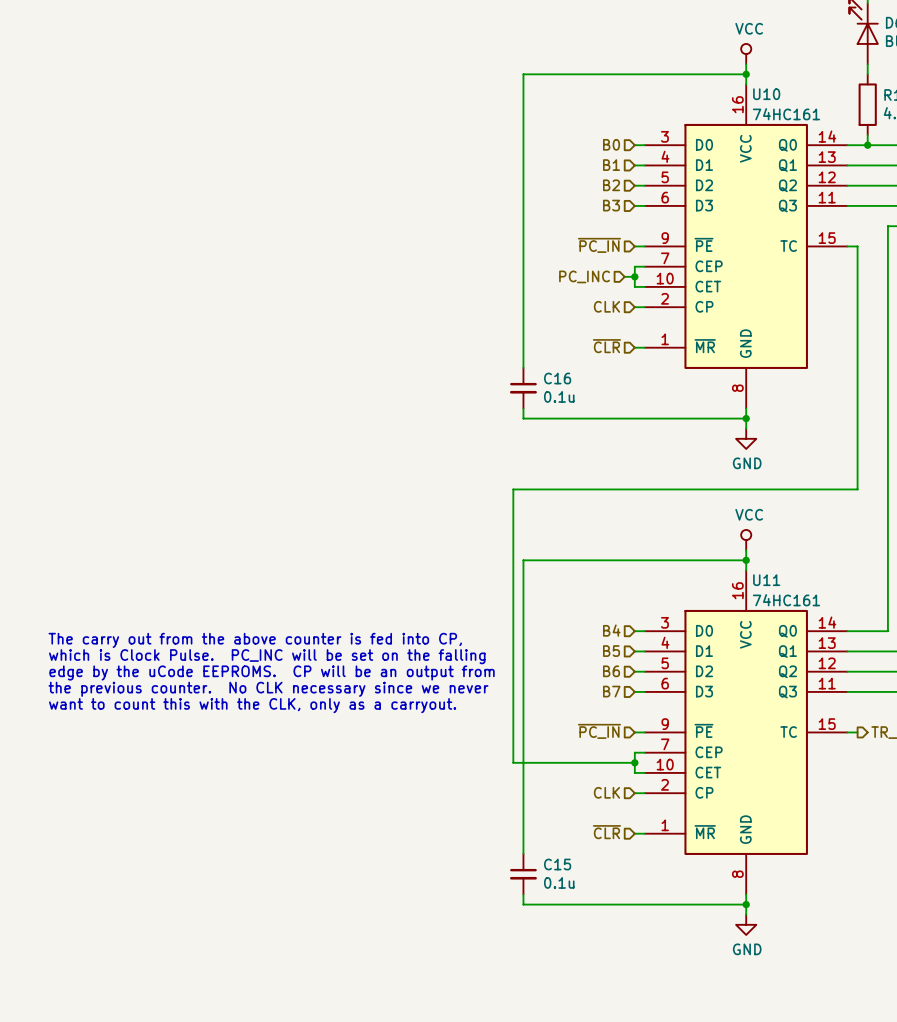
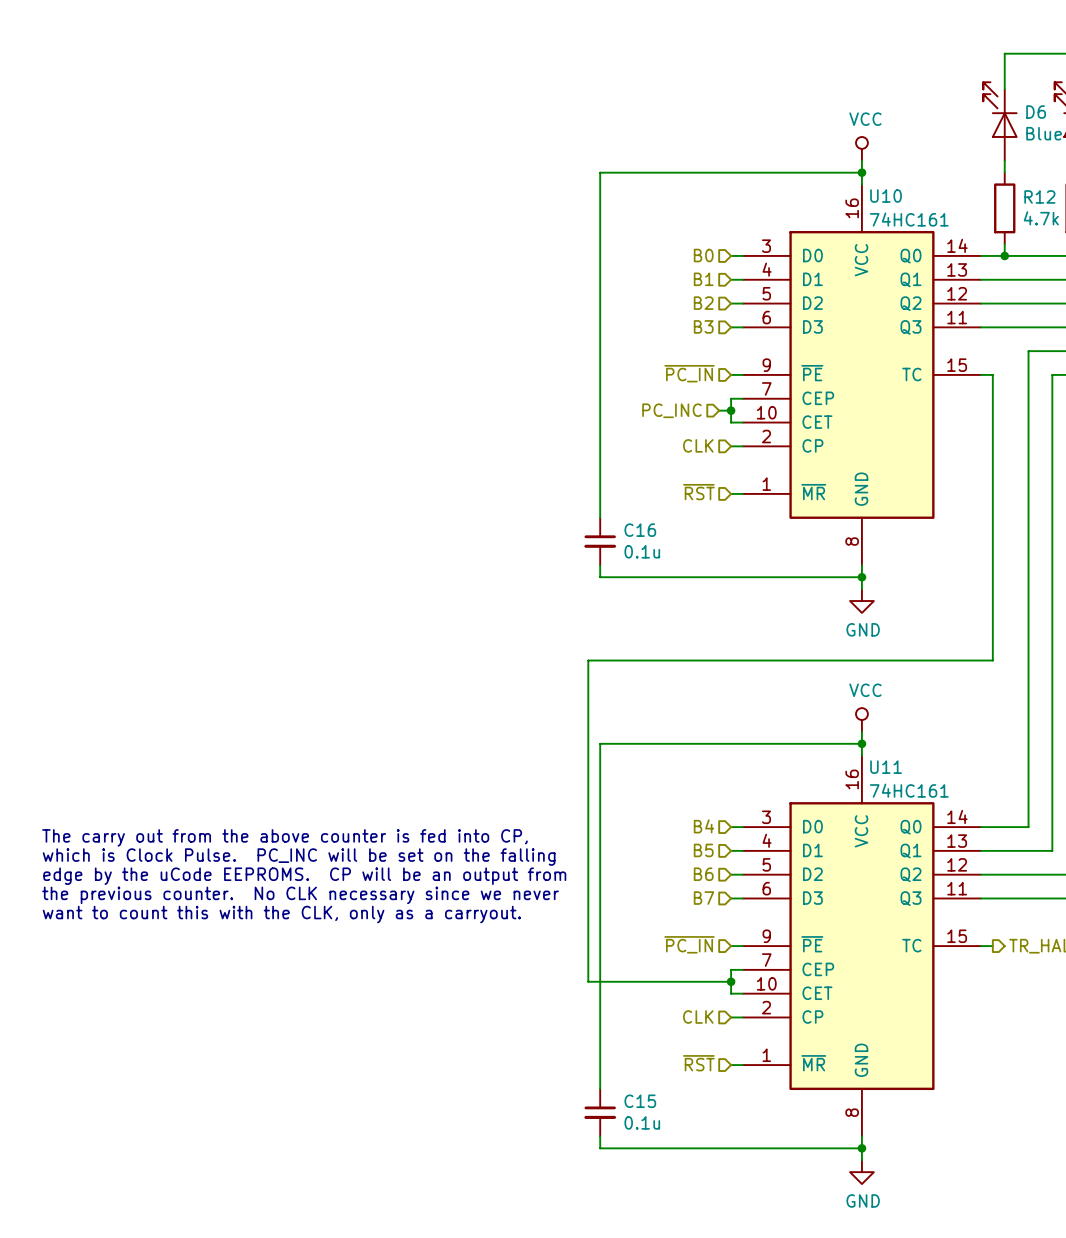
hierarchical label: ~{CLR} (606, 346) -> ~{RST} (698, 492)
hierarchical label: ~{CLR} (606, 832) -> ~{RST} (698, 1063)

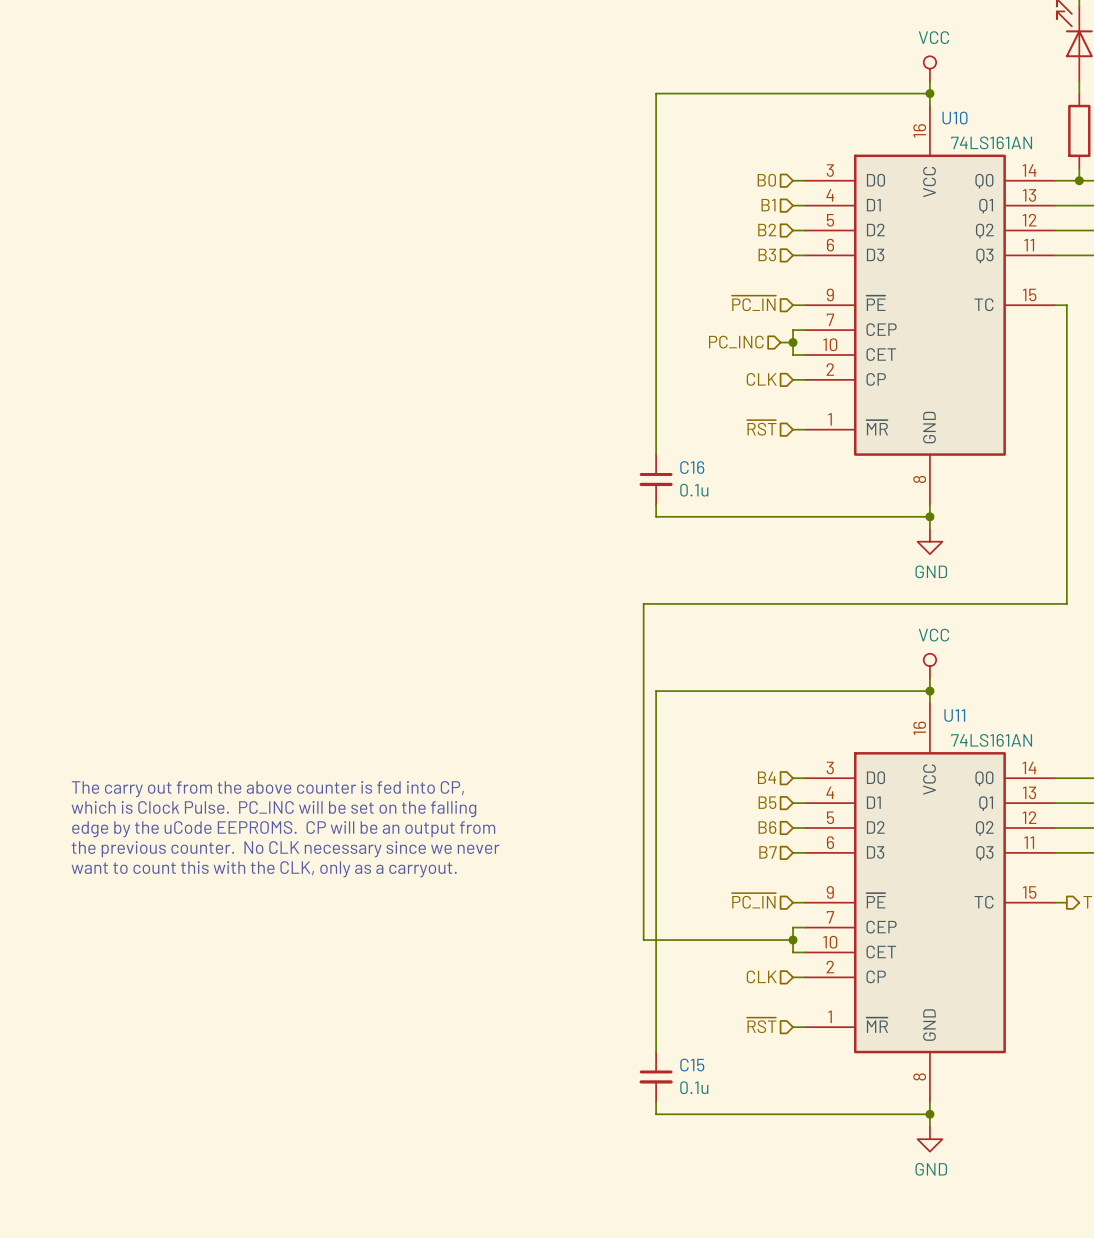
U10 value: 74HC161 (909, 219) -> 74LS161AN (991, 142)
U11 value: 74HC161 (909, 790) -> 74LS161AN (991, 740)

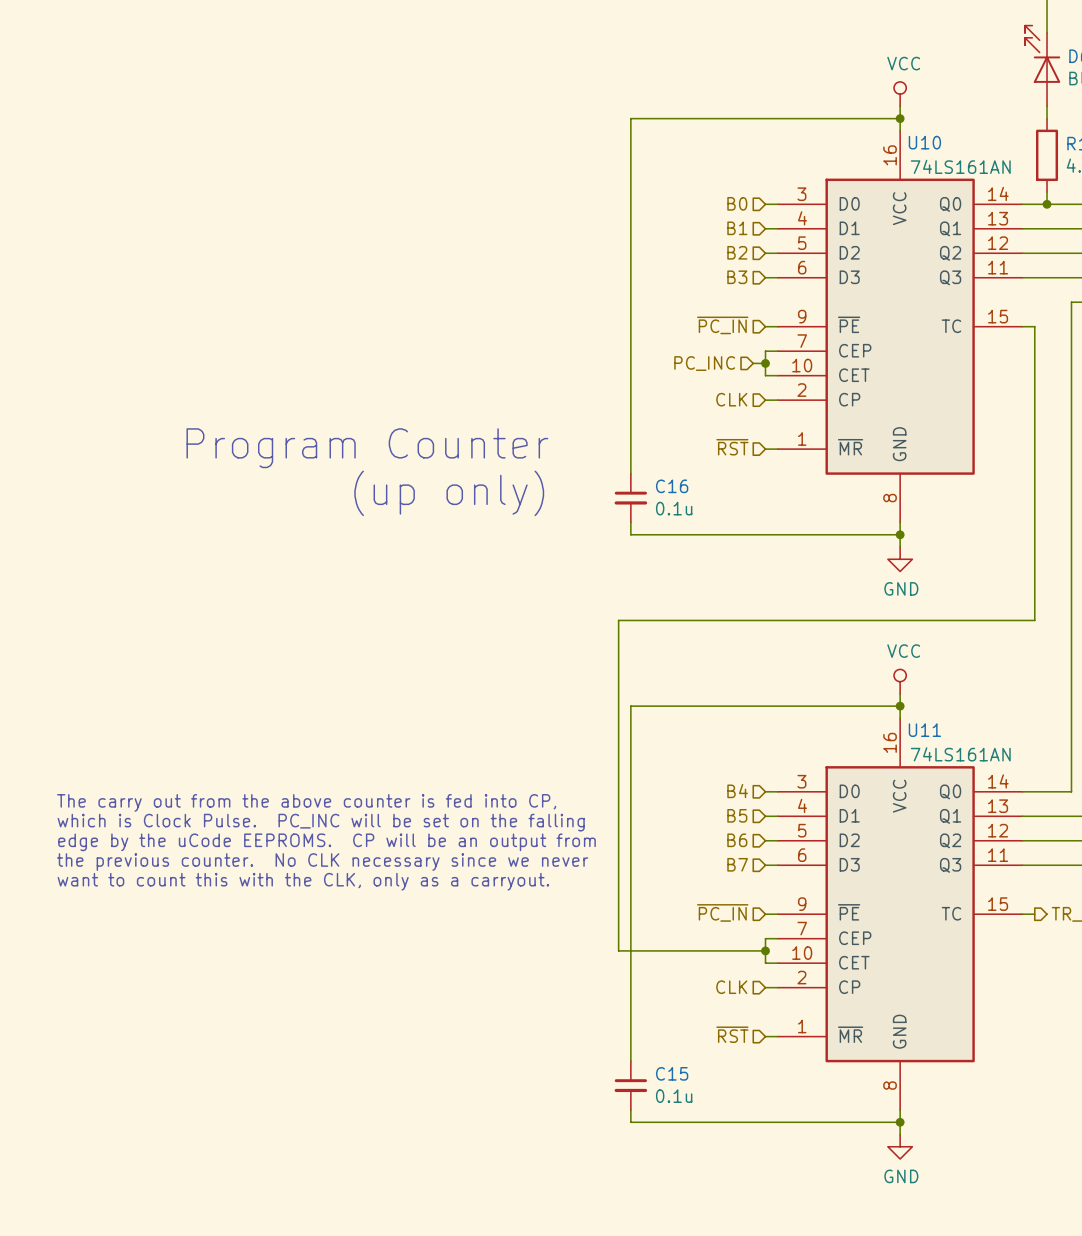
text: none -> Program Counter (367, 448)
text: none -> (up only) (449, 493)

